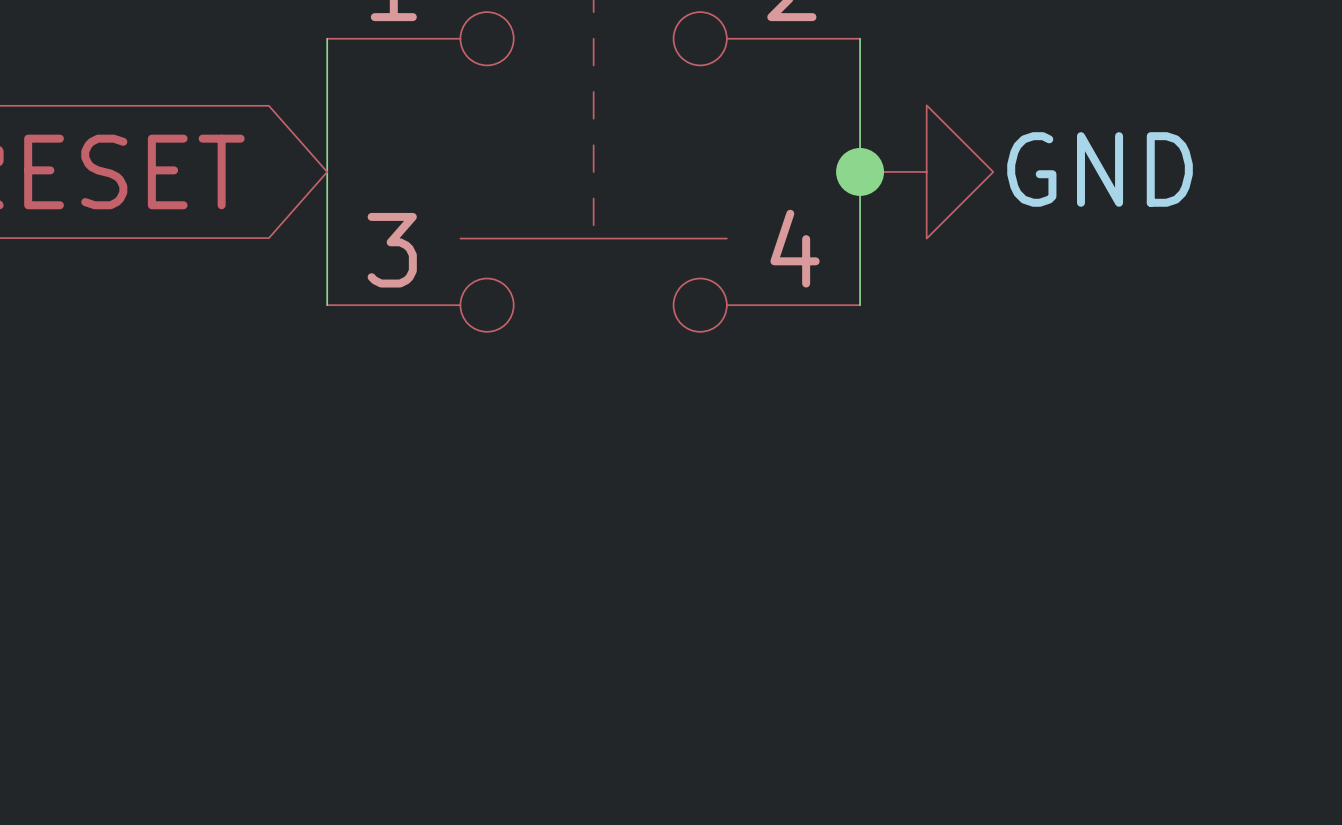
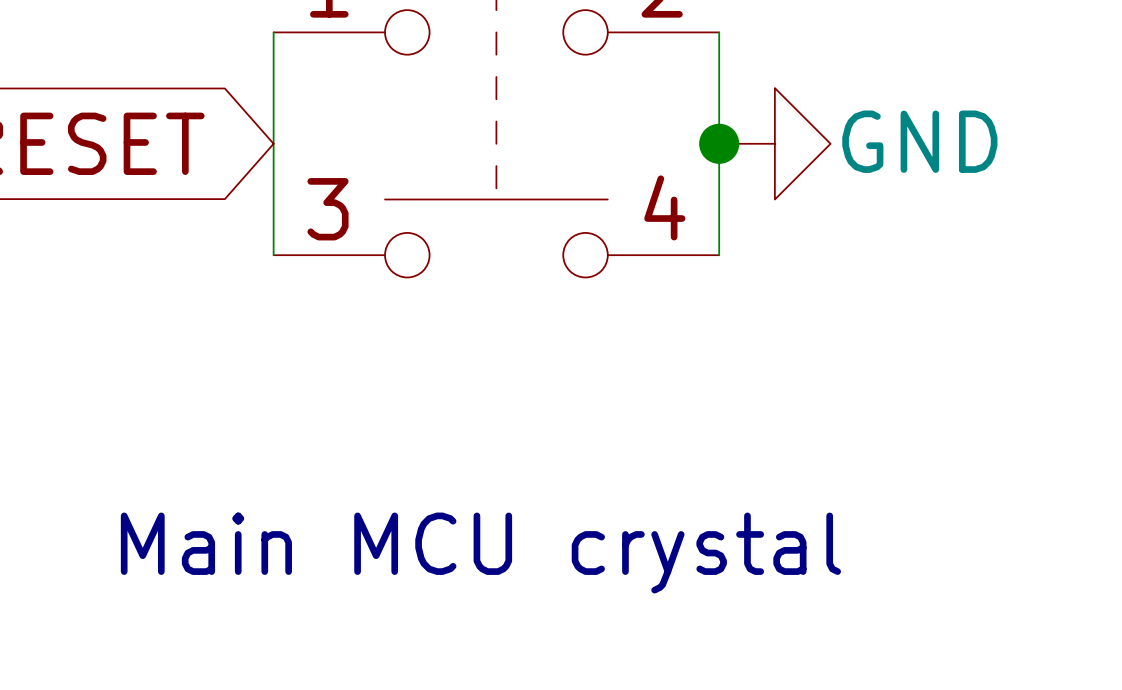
text: none -> Main MCU crystal (480, 553)

